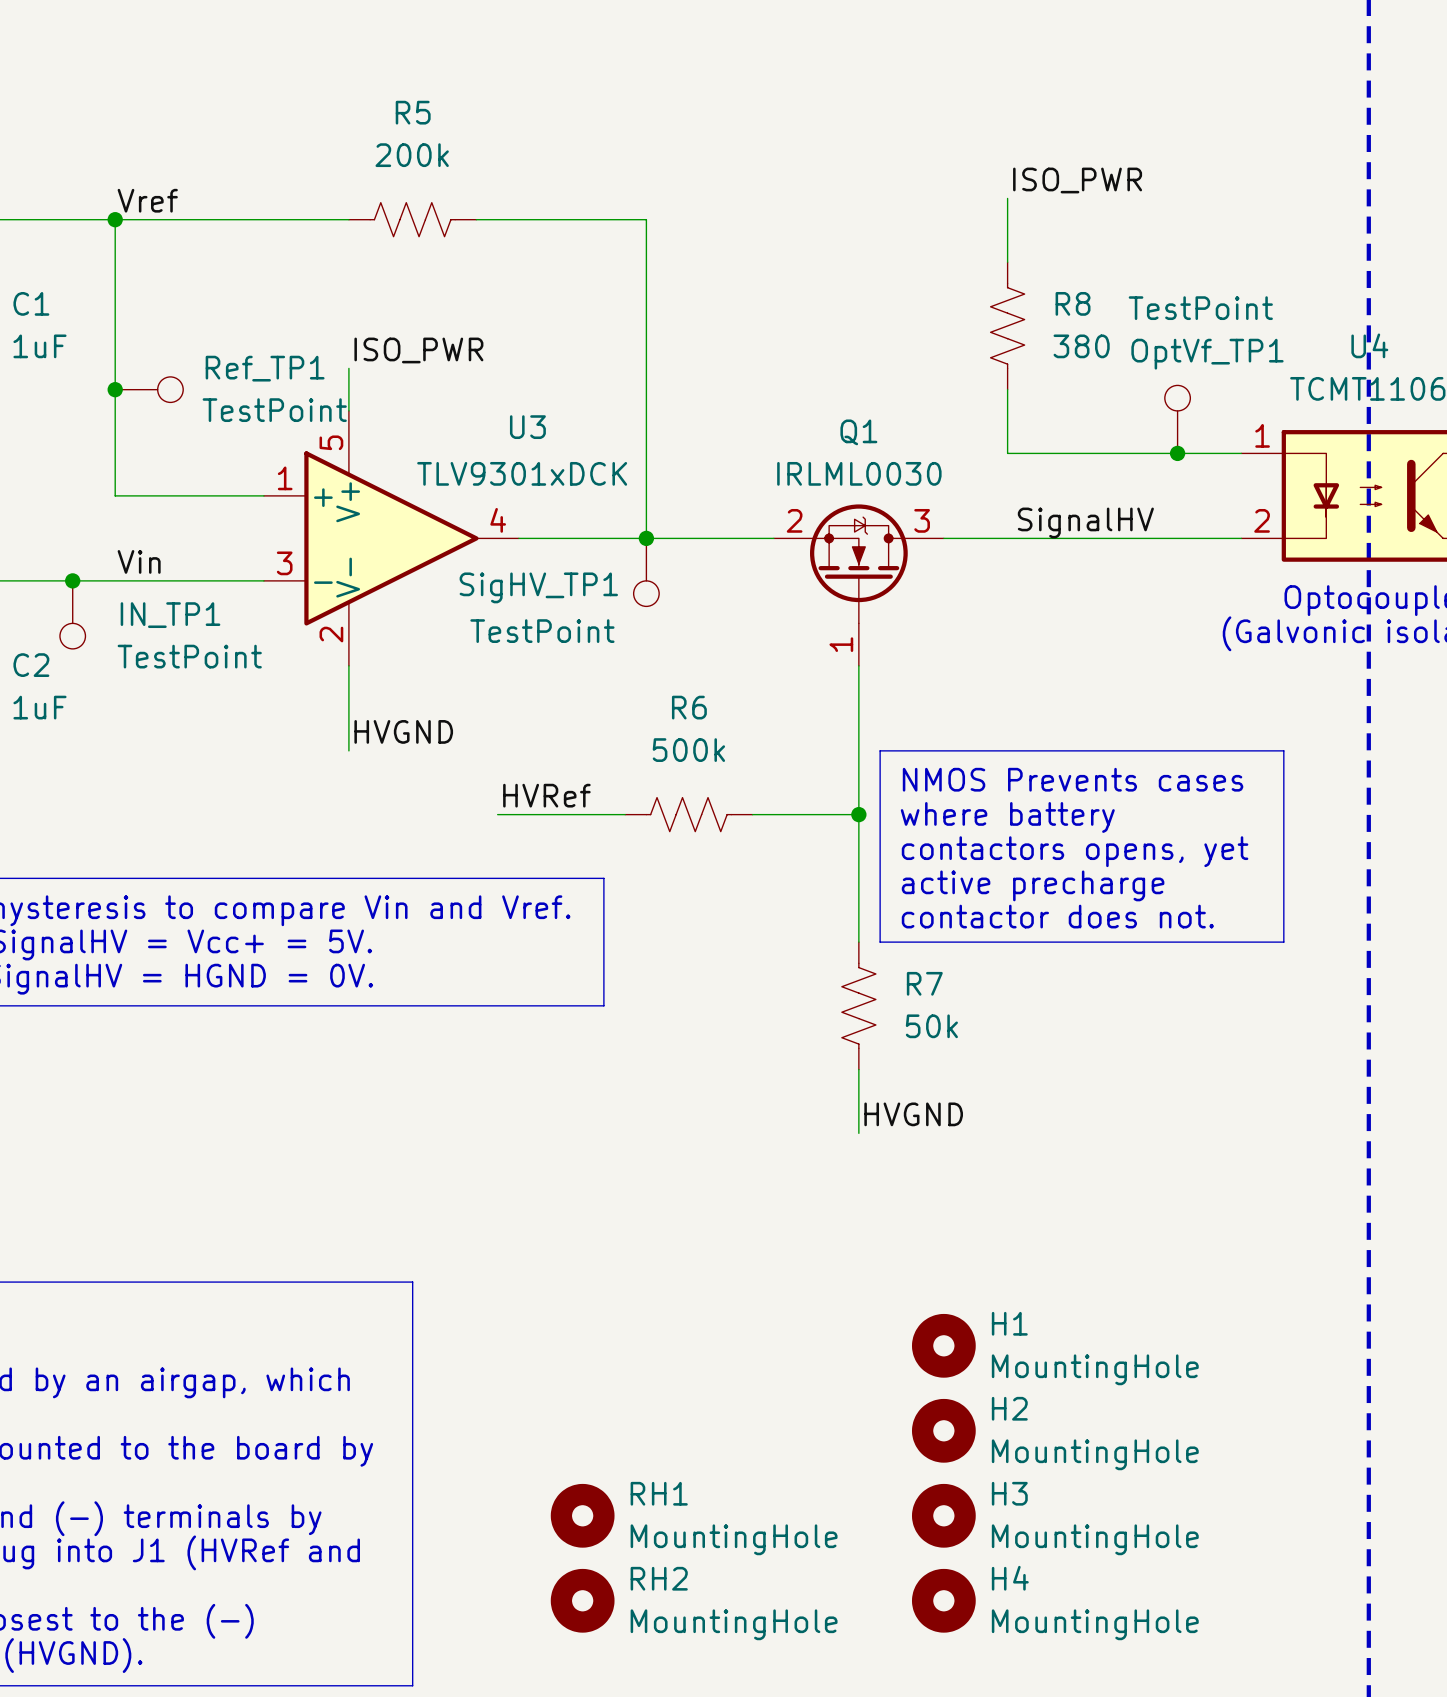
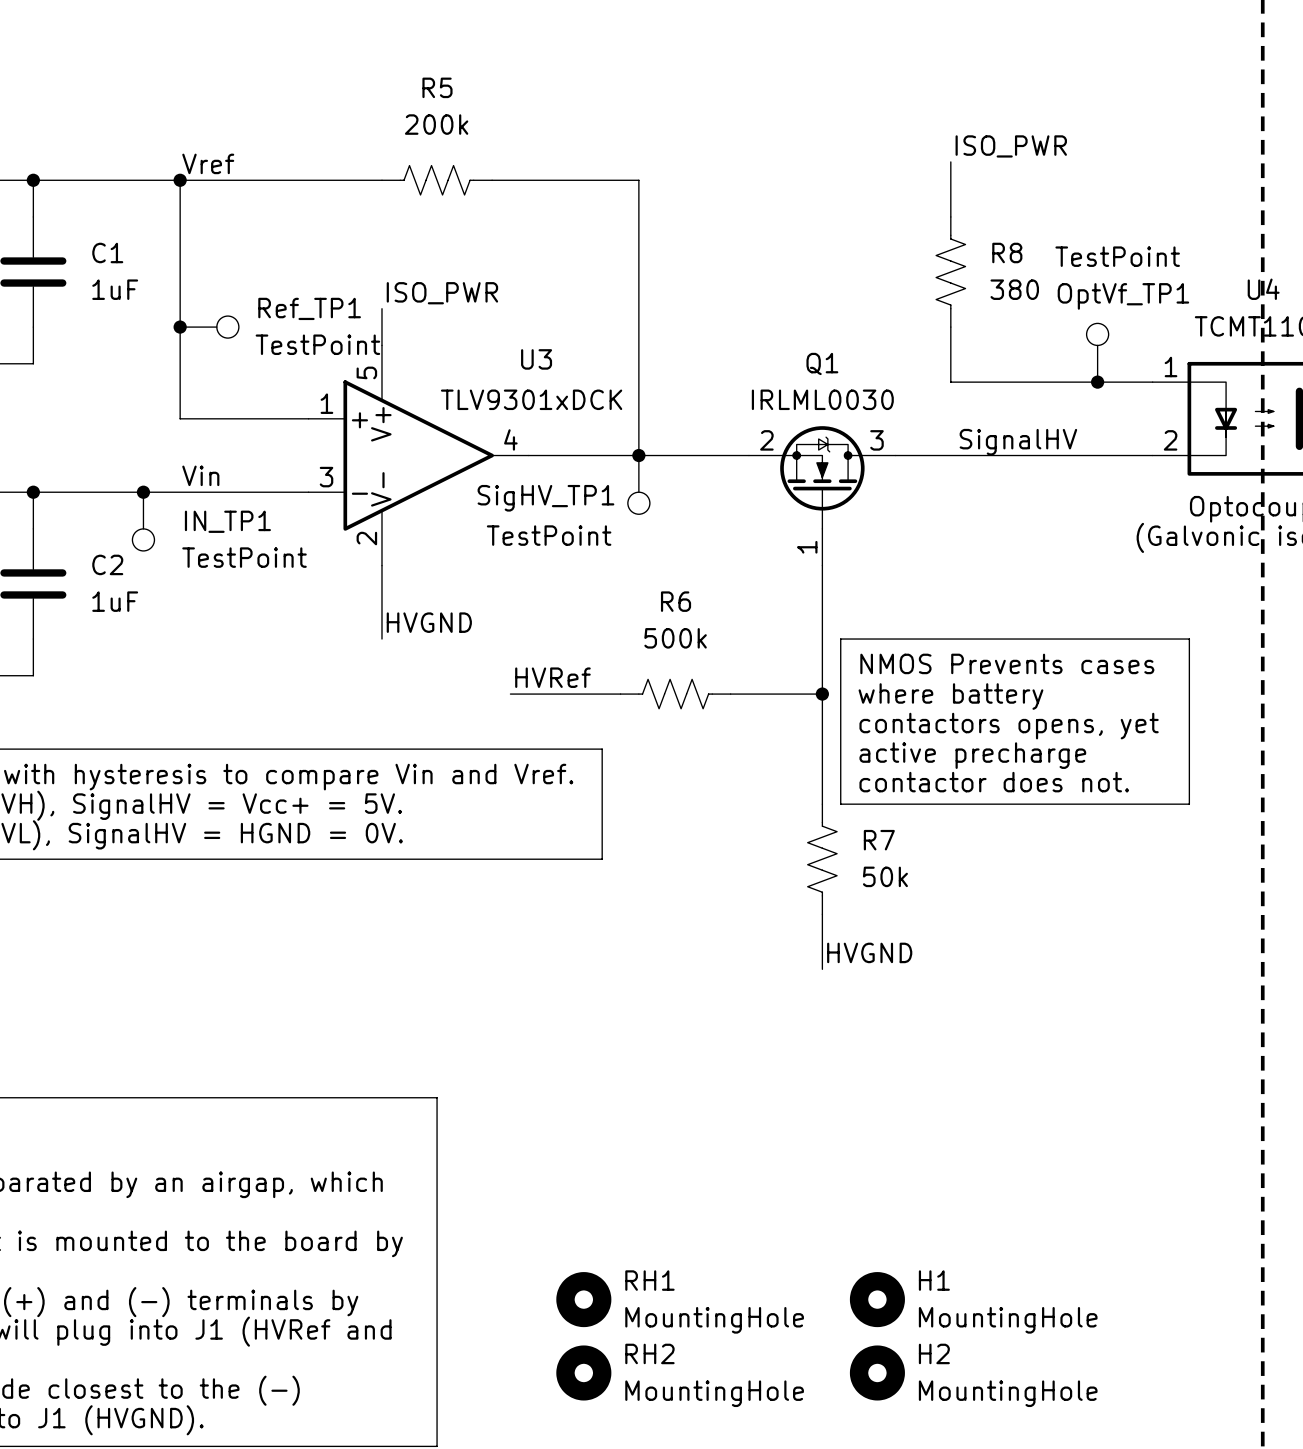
H1 position: (943, 1345) -> (877, 1299)
H2 position: (943, 1430) -> (877, 1372)
H3: MountingHole (943, 1515) -> none
H4: MountingHole (943, 1600) -> none

